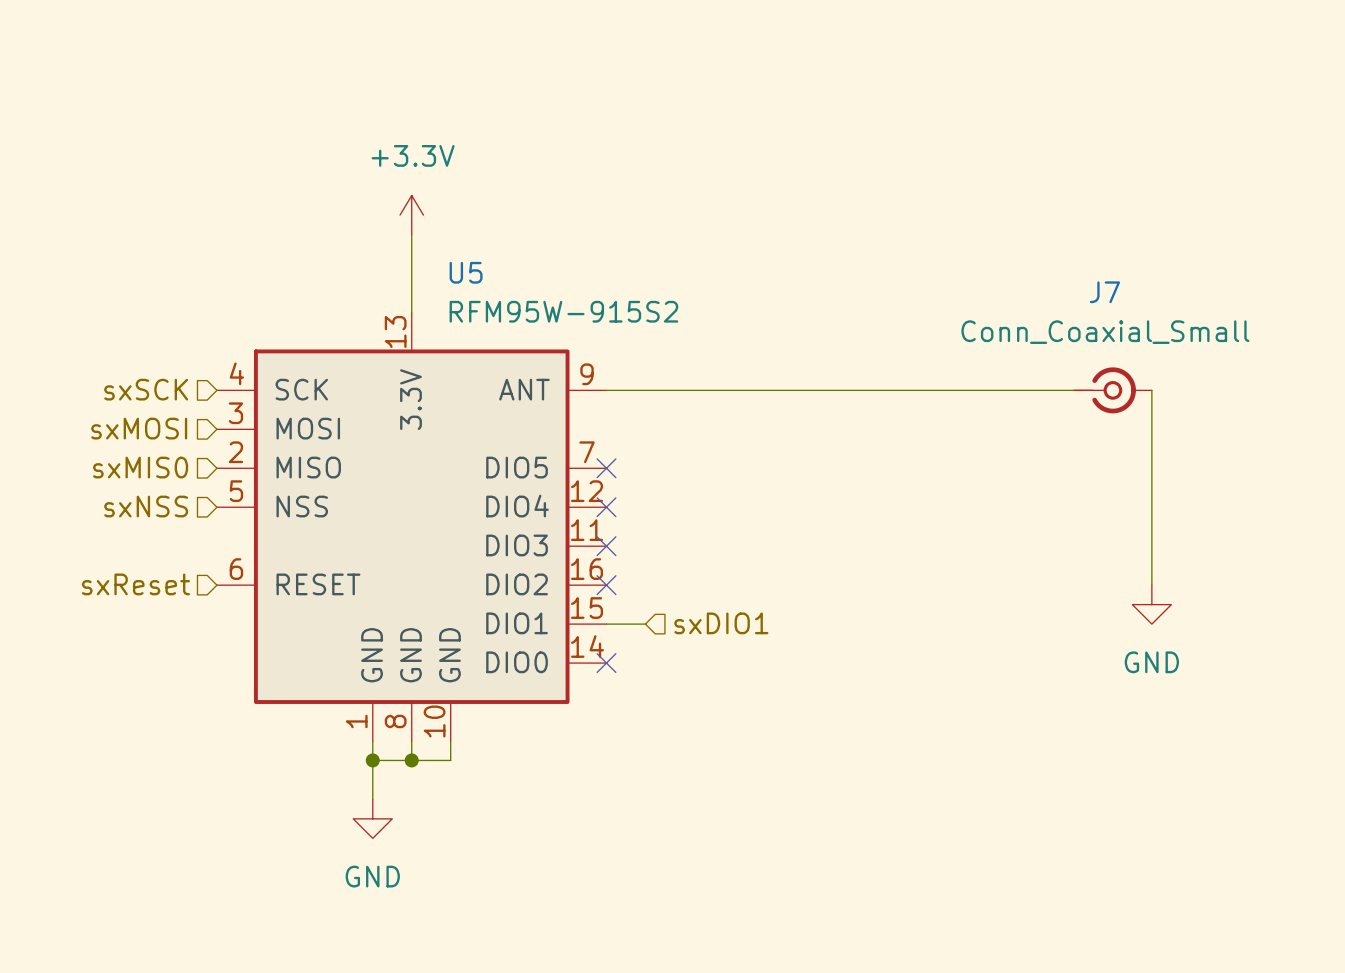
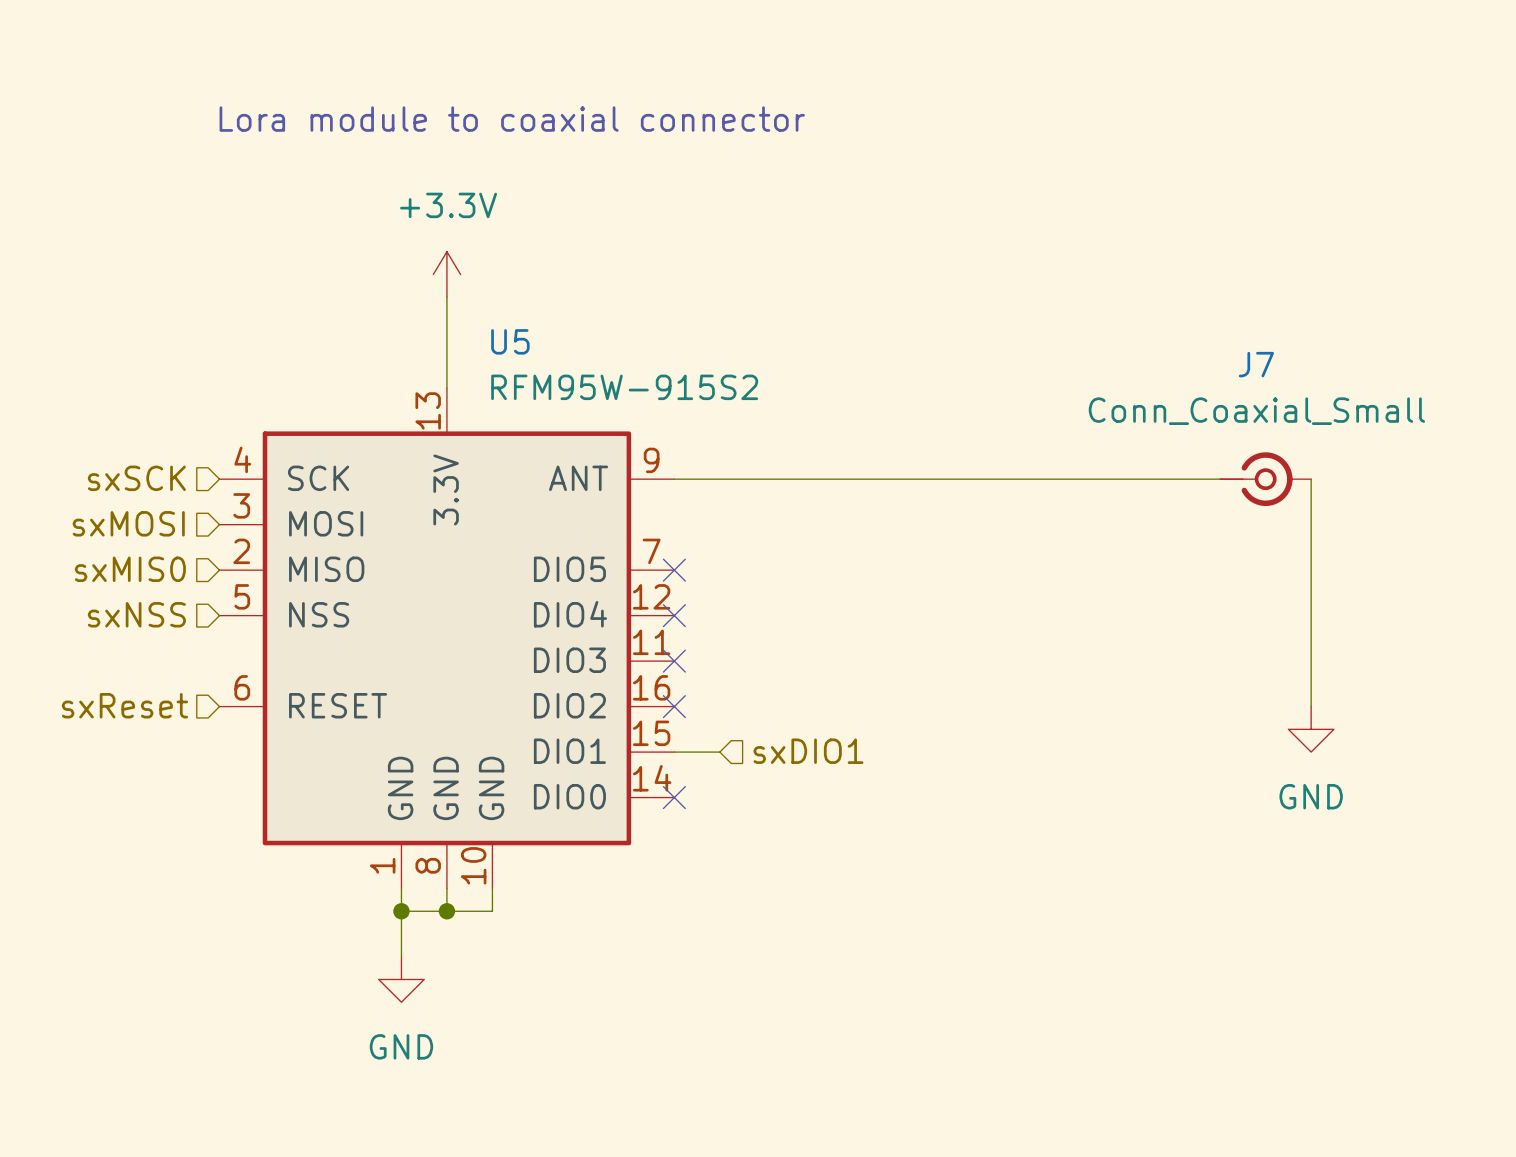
text: none -> Lora module to coaxial connector (512, 119)

